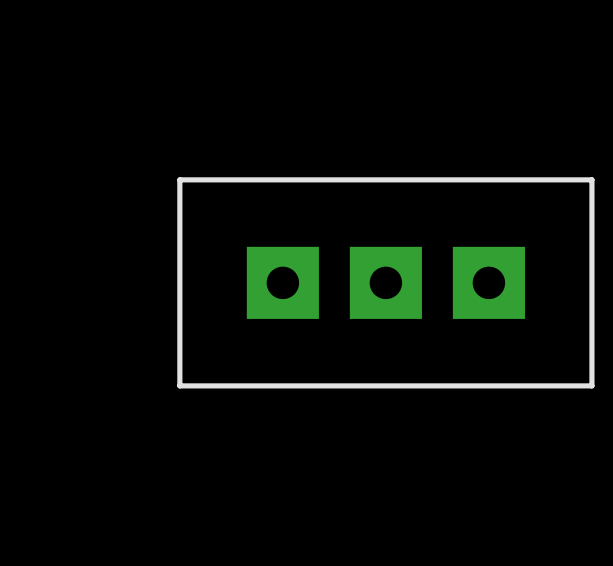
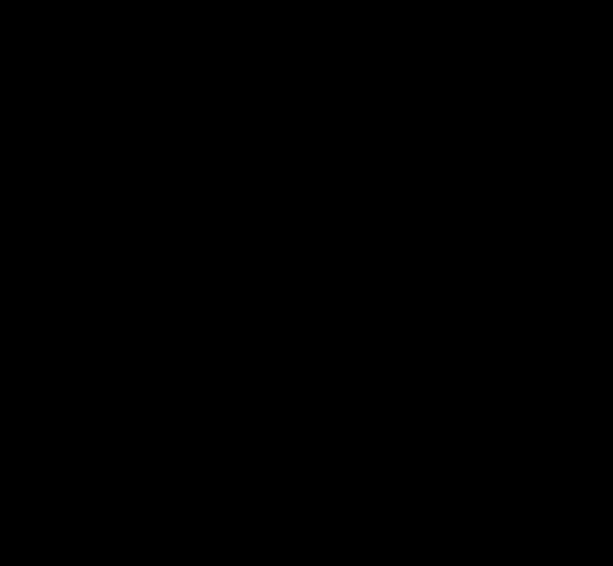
part: (385, 282) -> none

